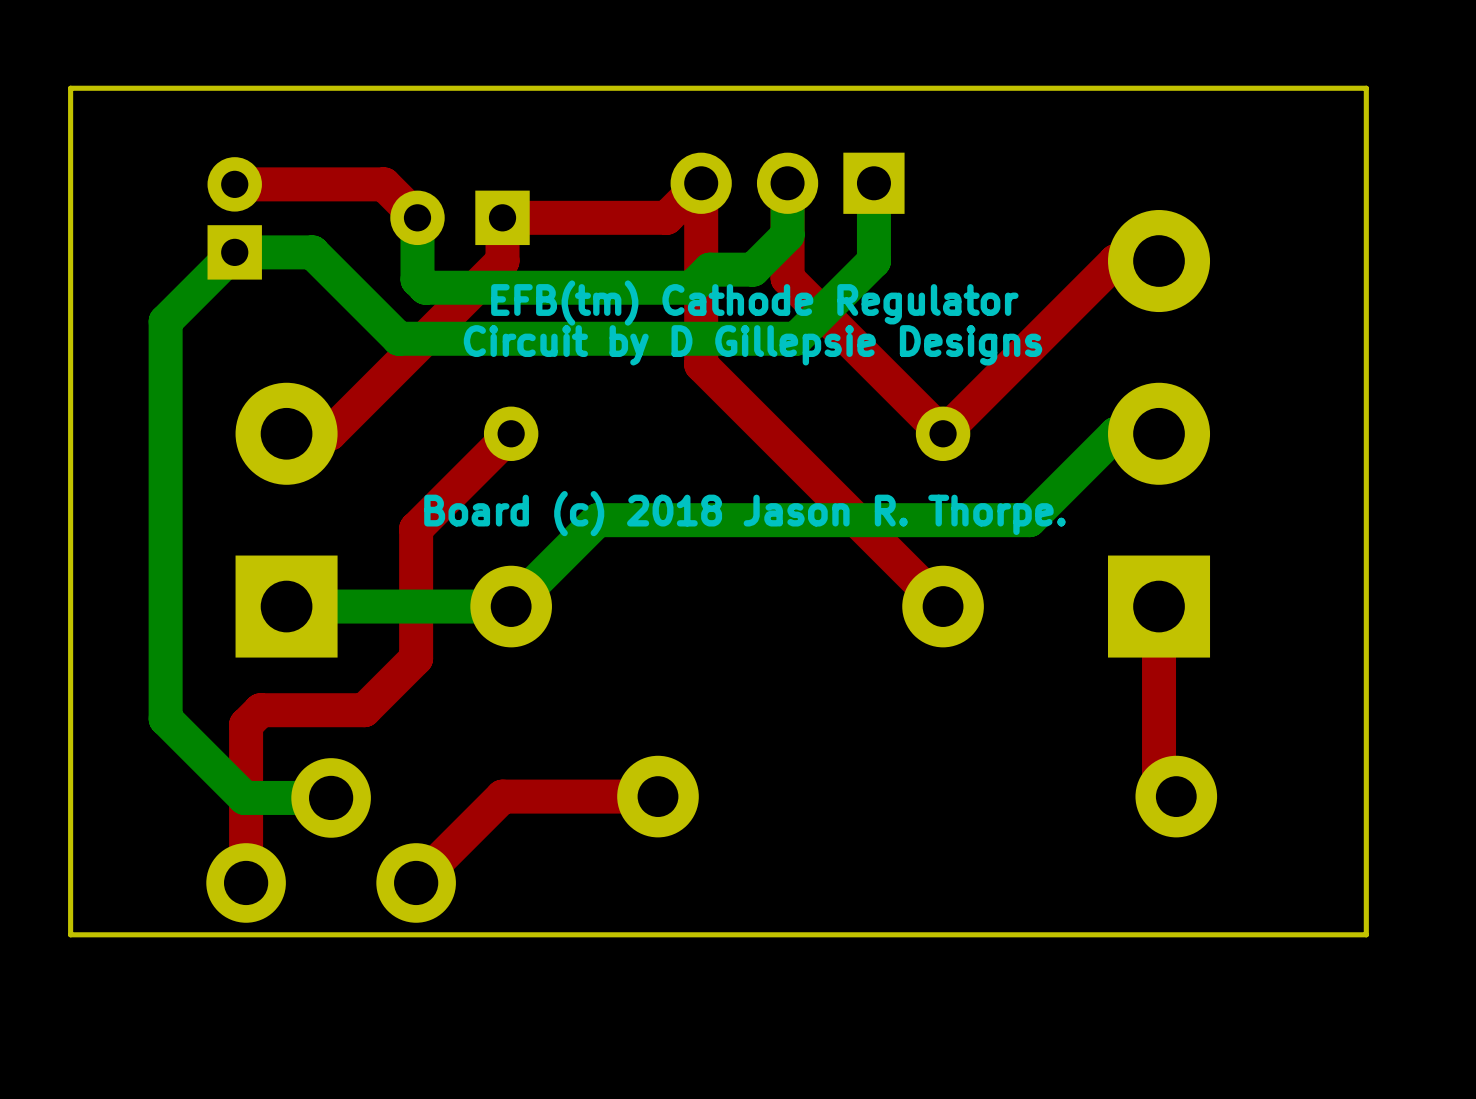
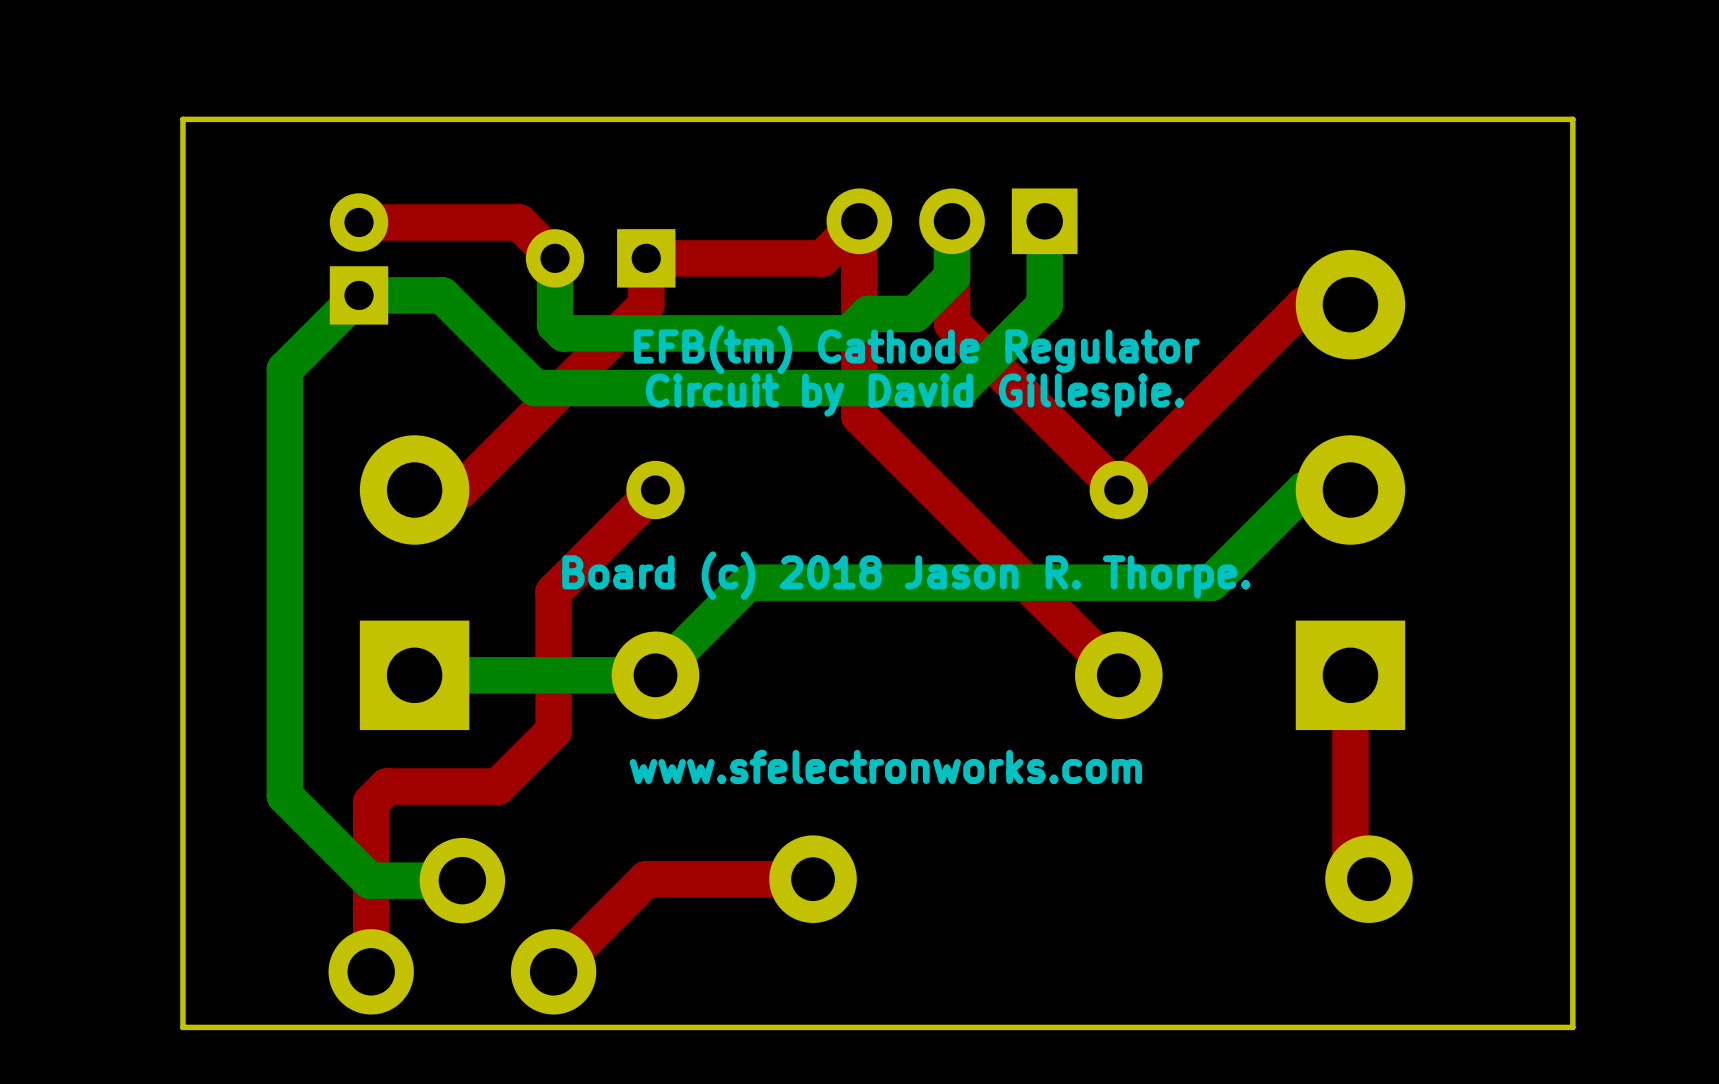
text: Circuit by D Gillepsie Designs (753, 345) -> Circuit by David Gillespie. (914, 395)
text: none -> www.sfelectronworks.com (885, 766)

